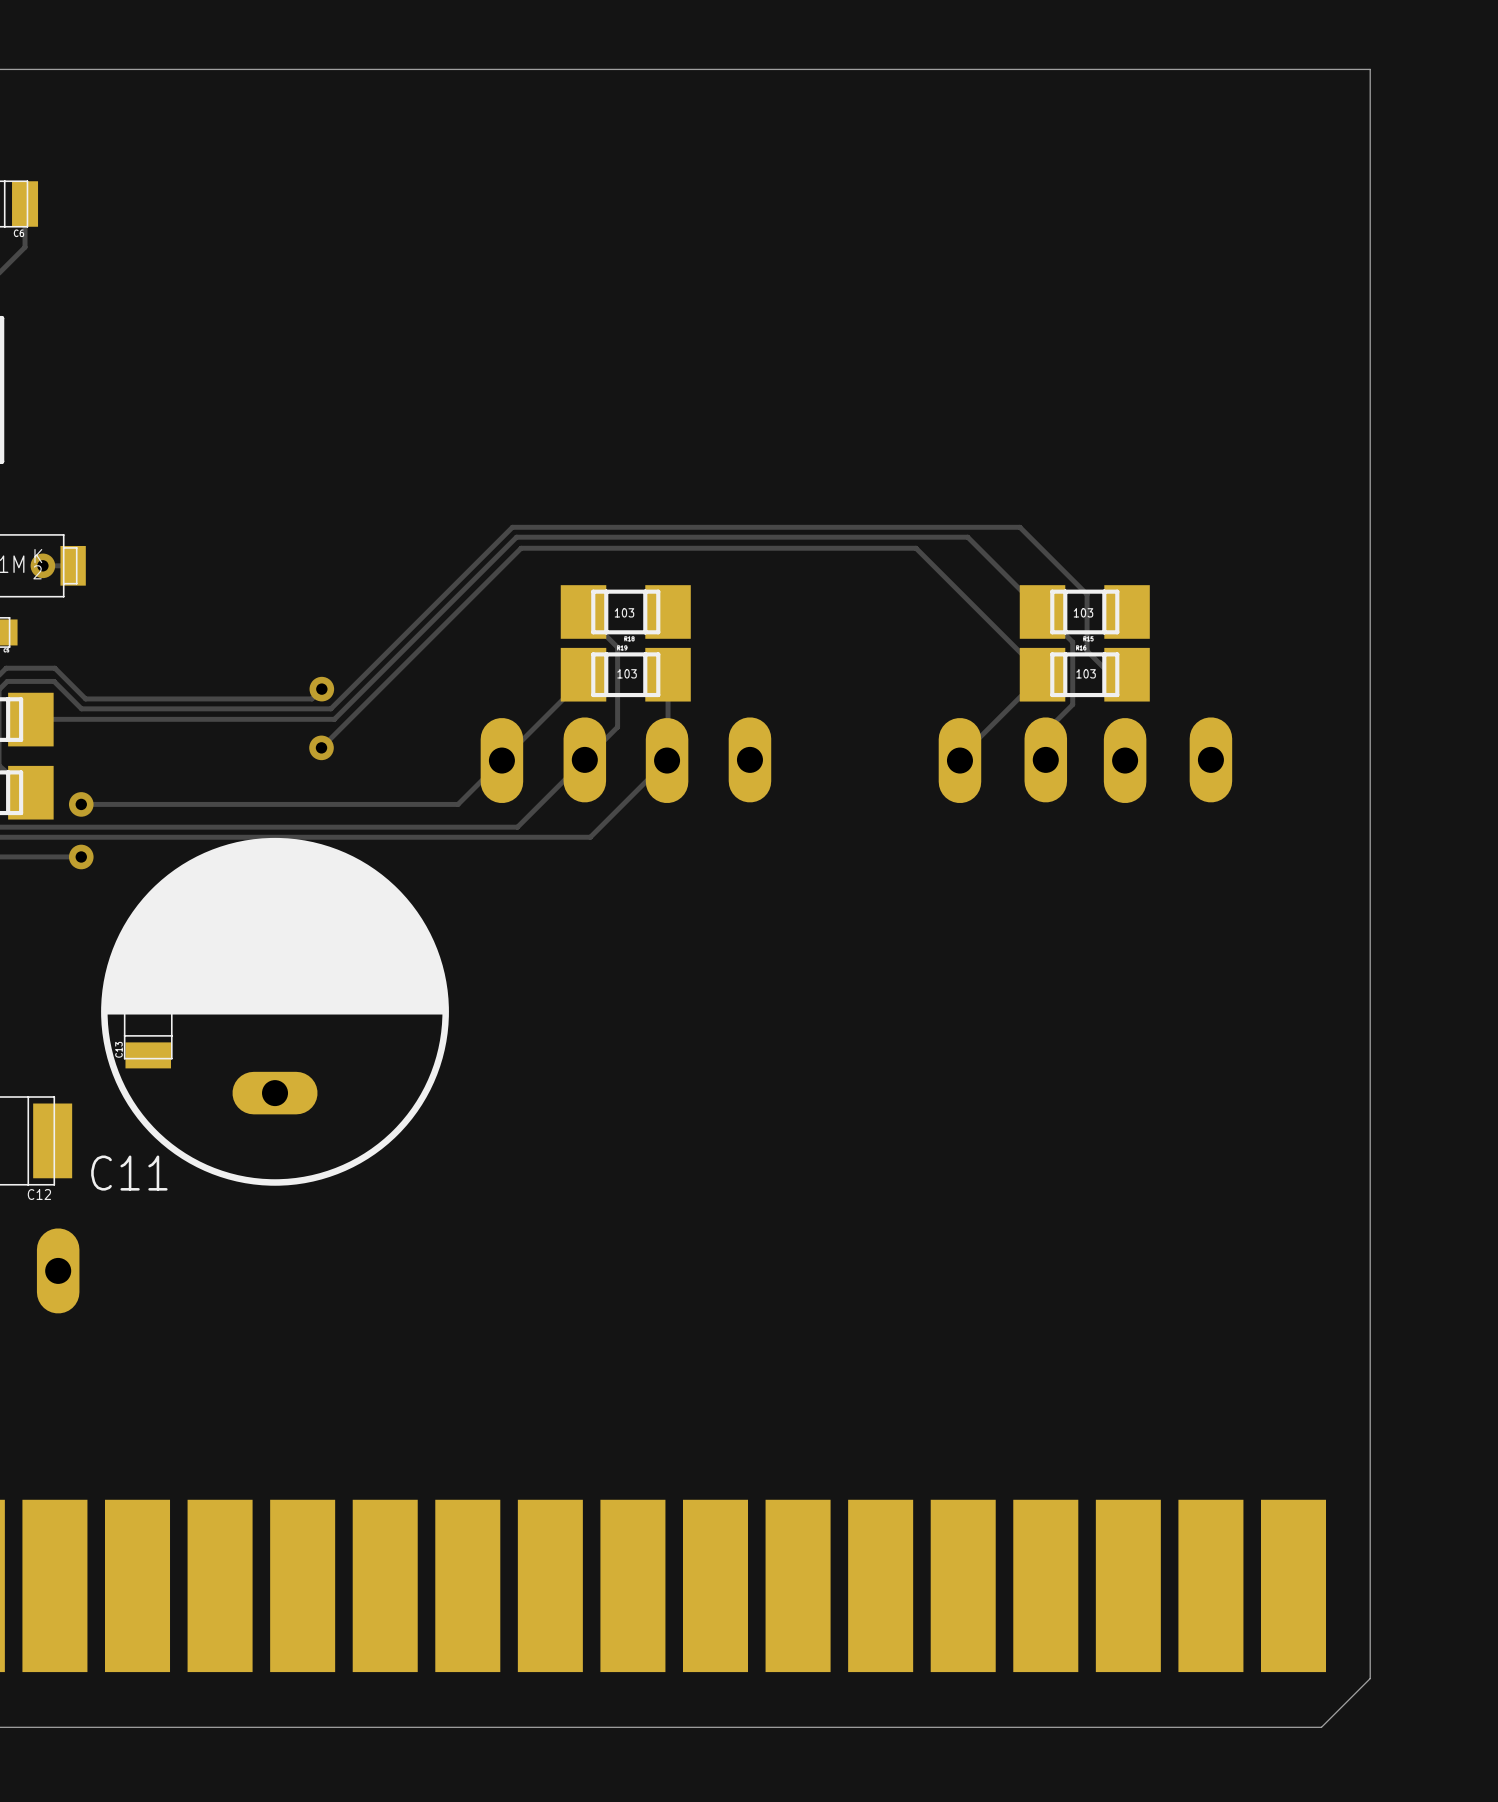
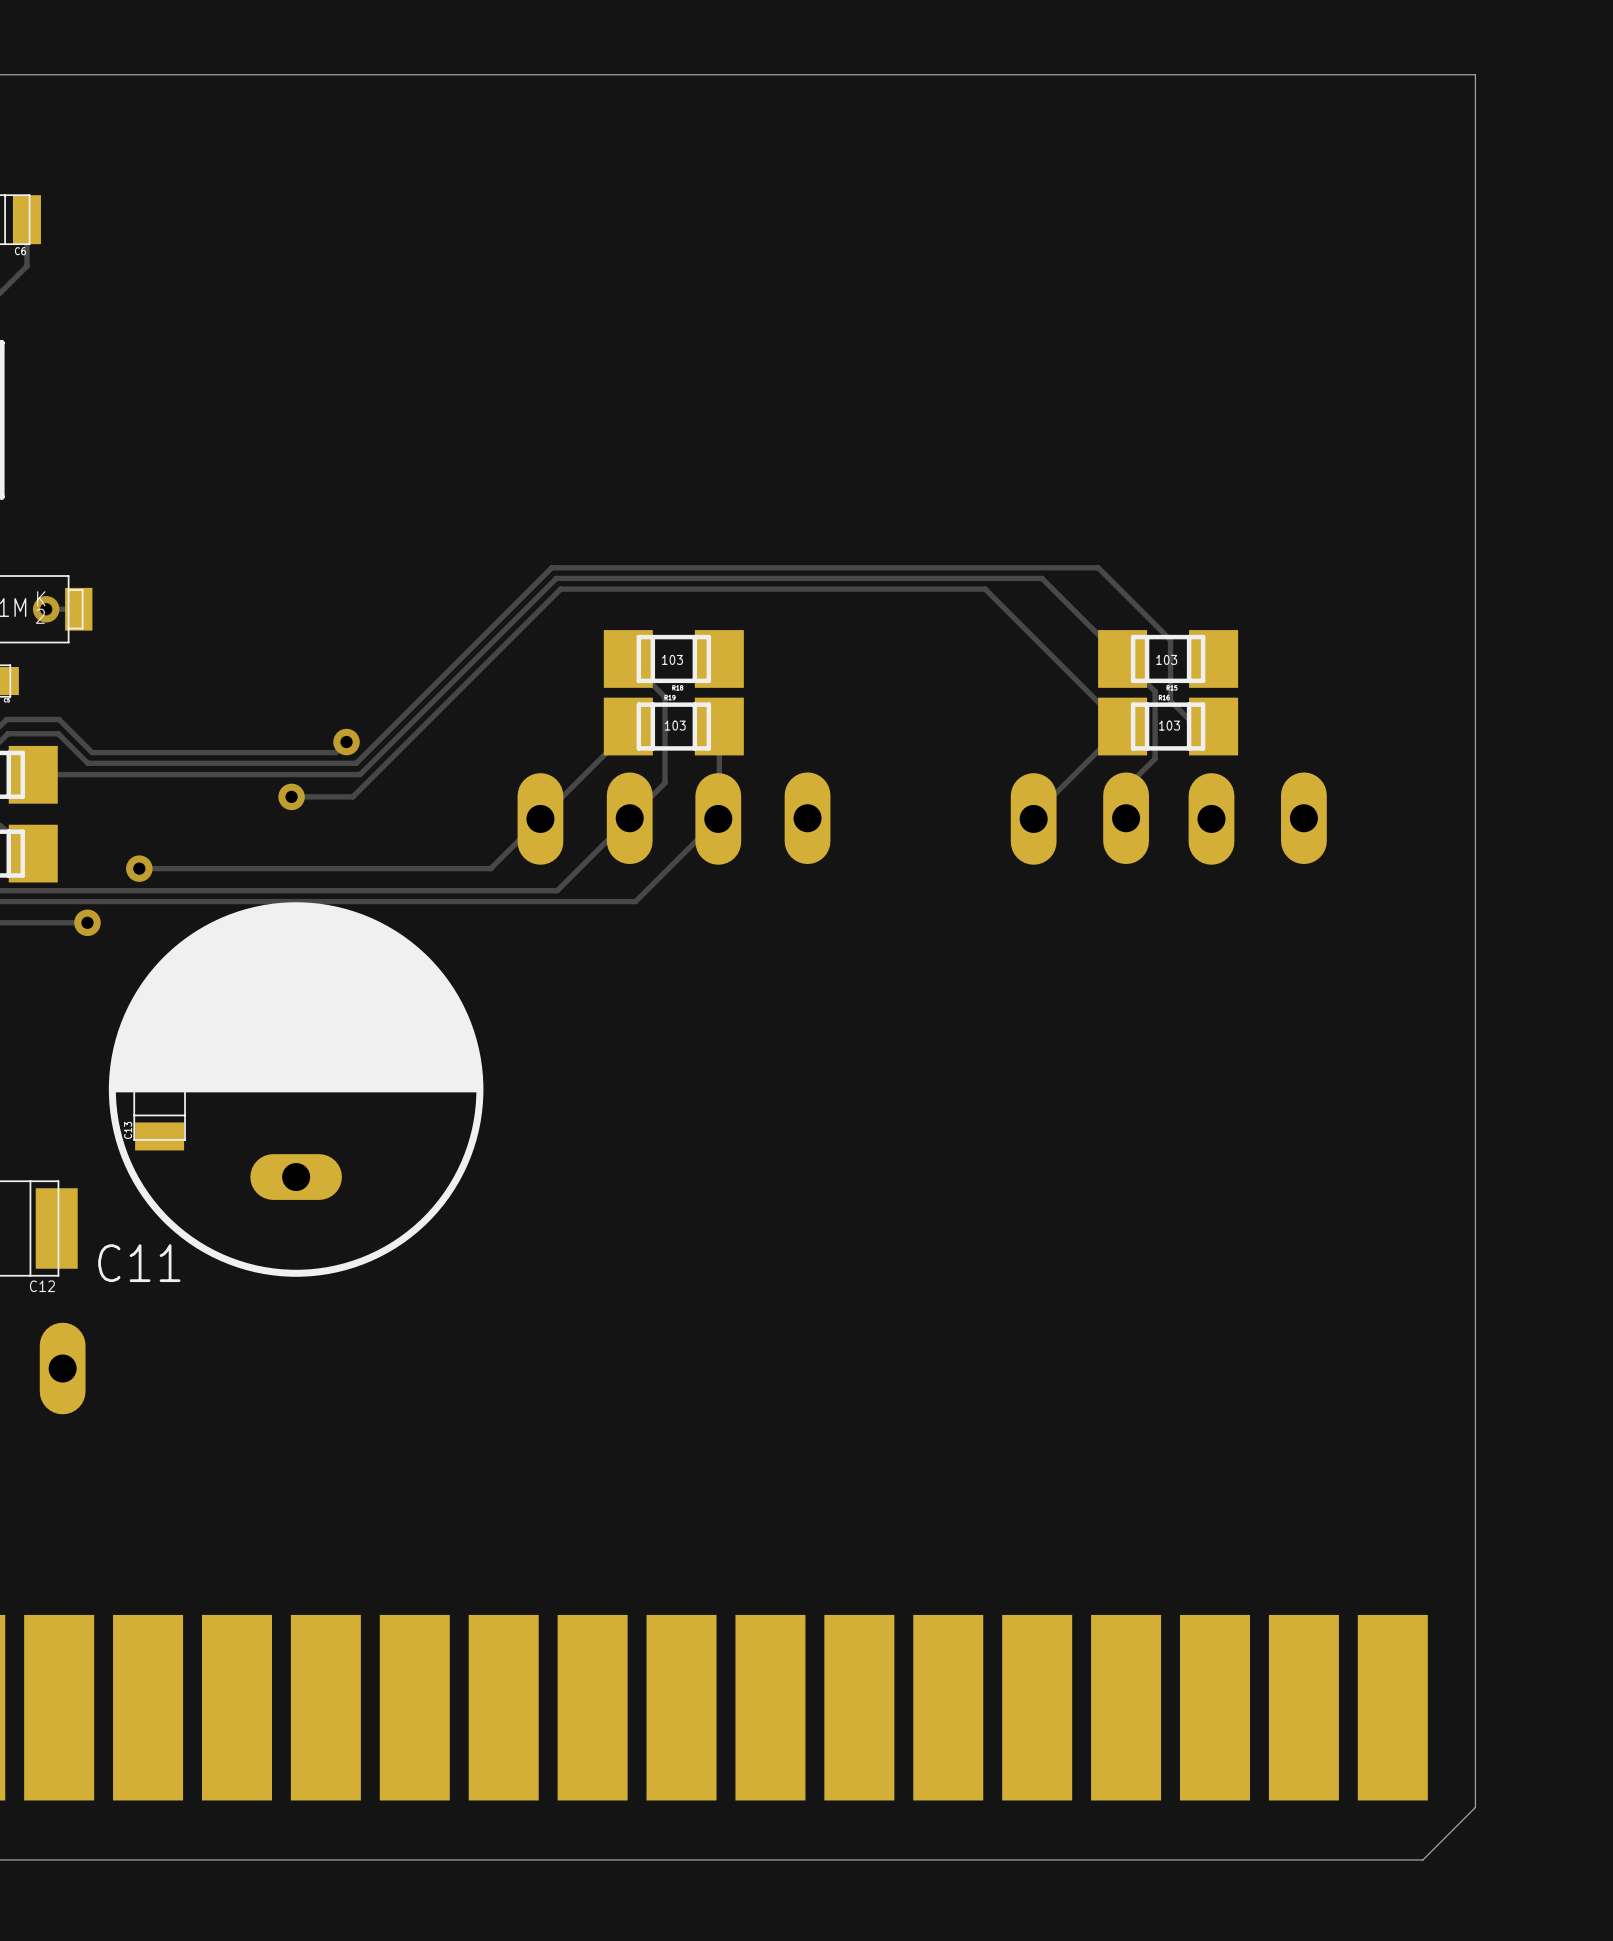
track: (916, 548) (521, 548) (321, 747) -> (986, 590) (560, 589) (352, 796) (291, 796)
via position: (321, 747) -> (291, 796)
via: (81, 804) -> none
track: (458, 804) (81, 804) -> (493, 866) (490, 868) (139, 868)
via: none -> (139, 868)

